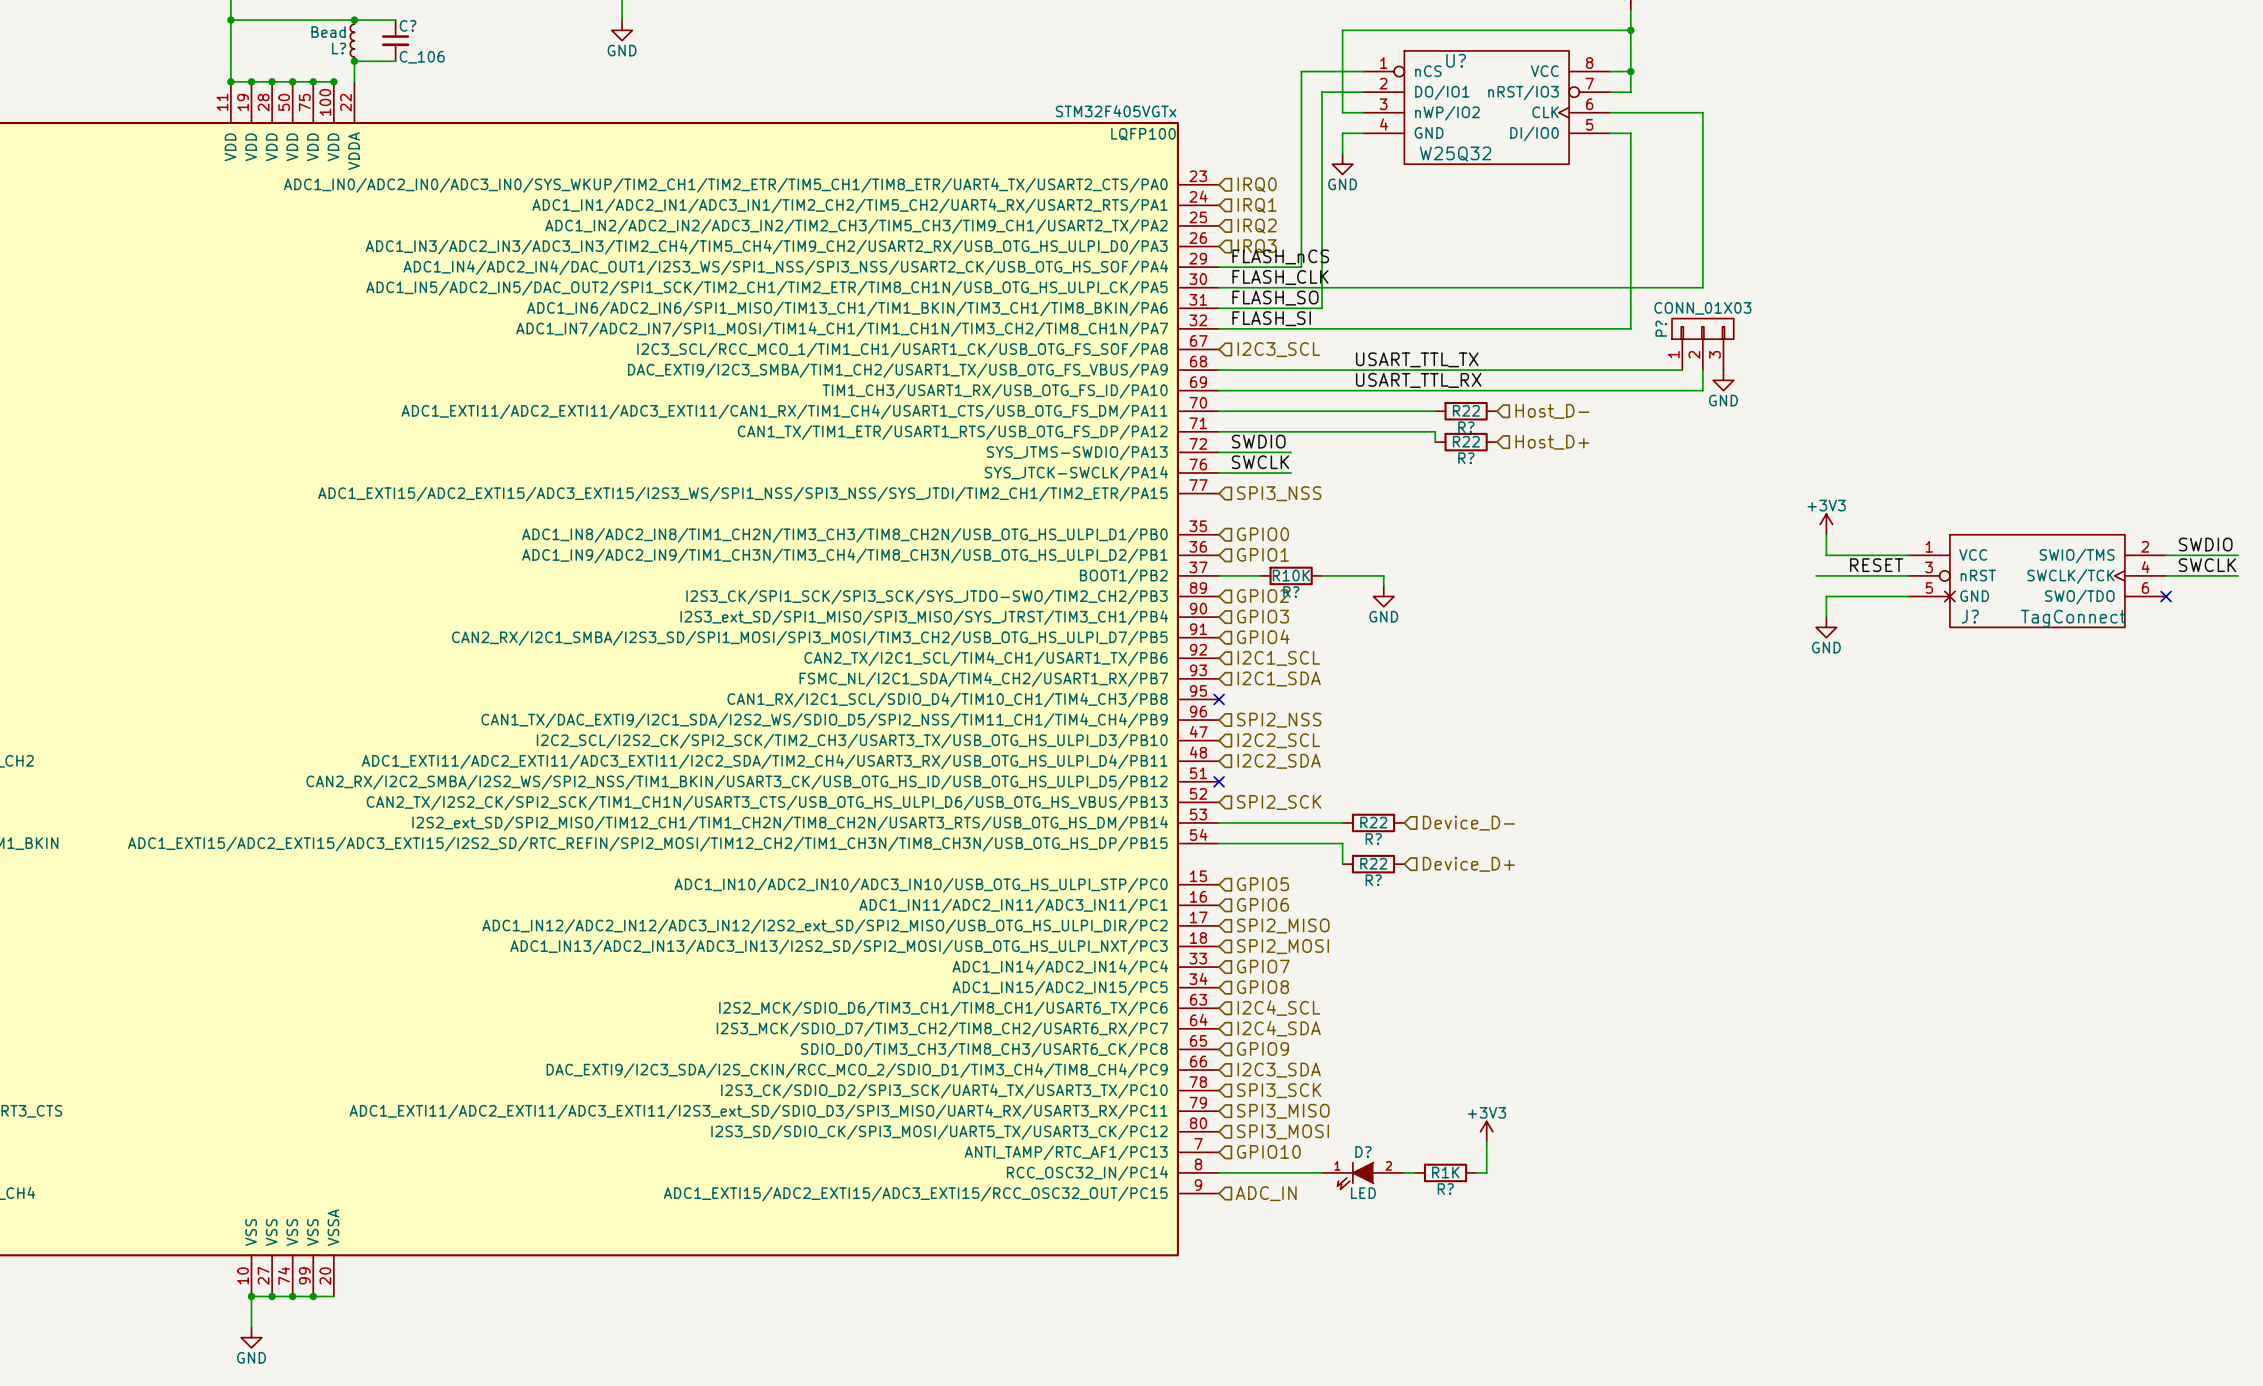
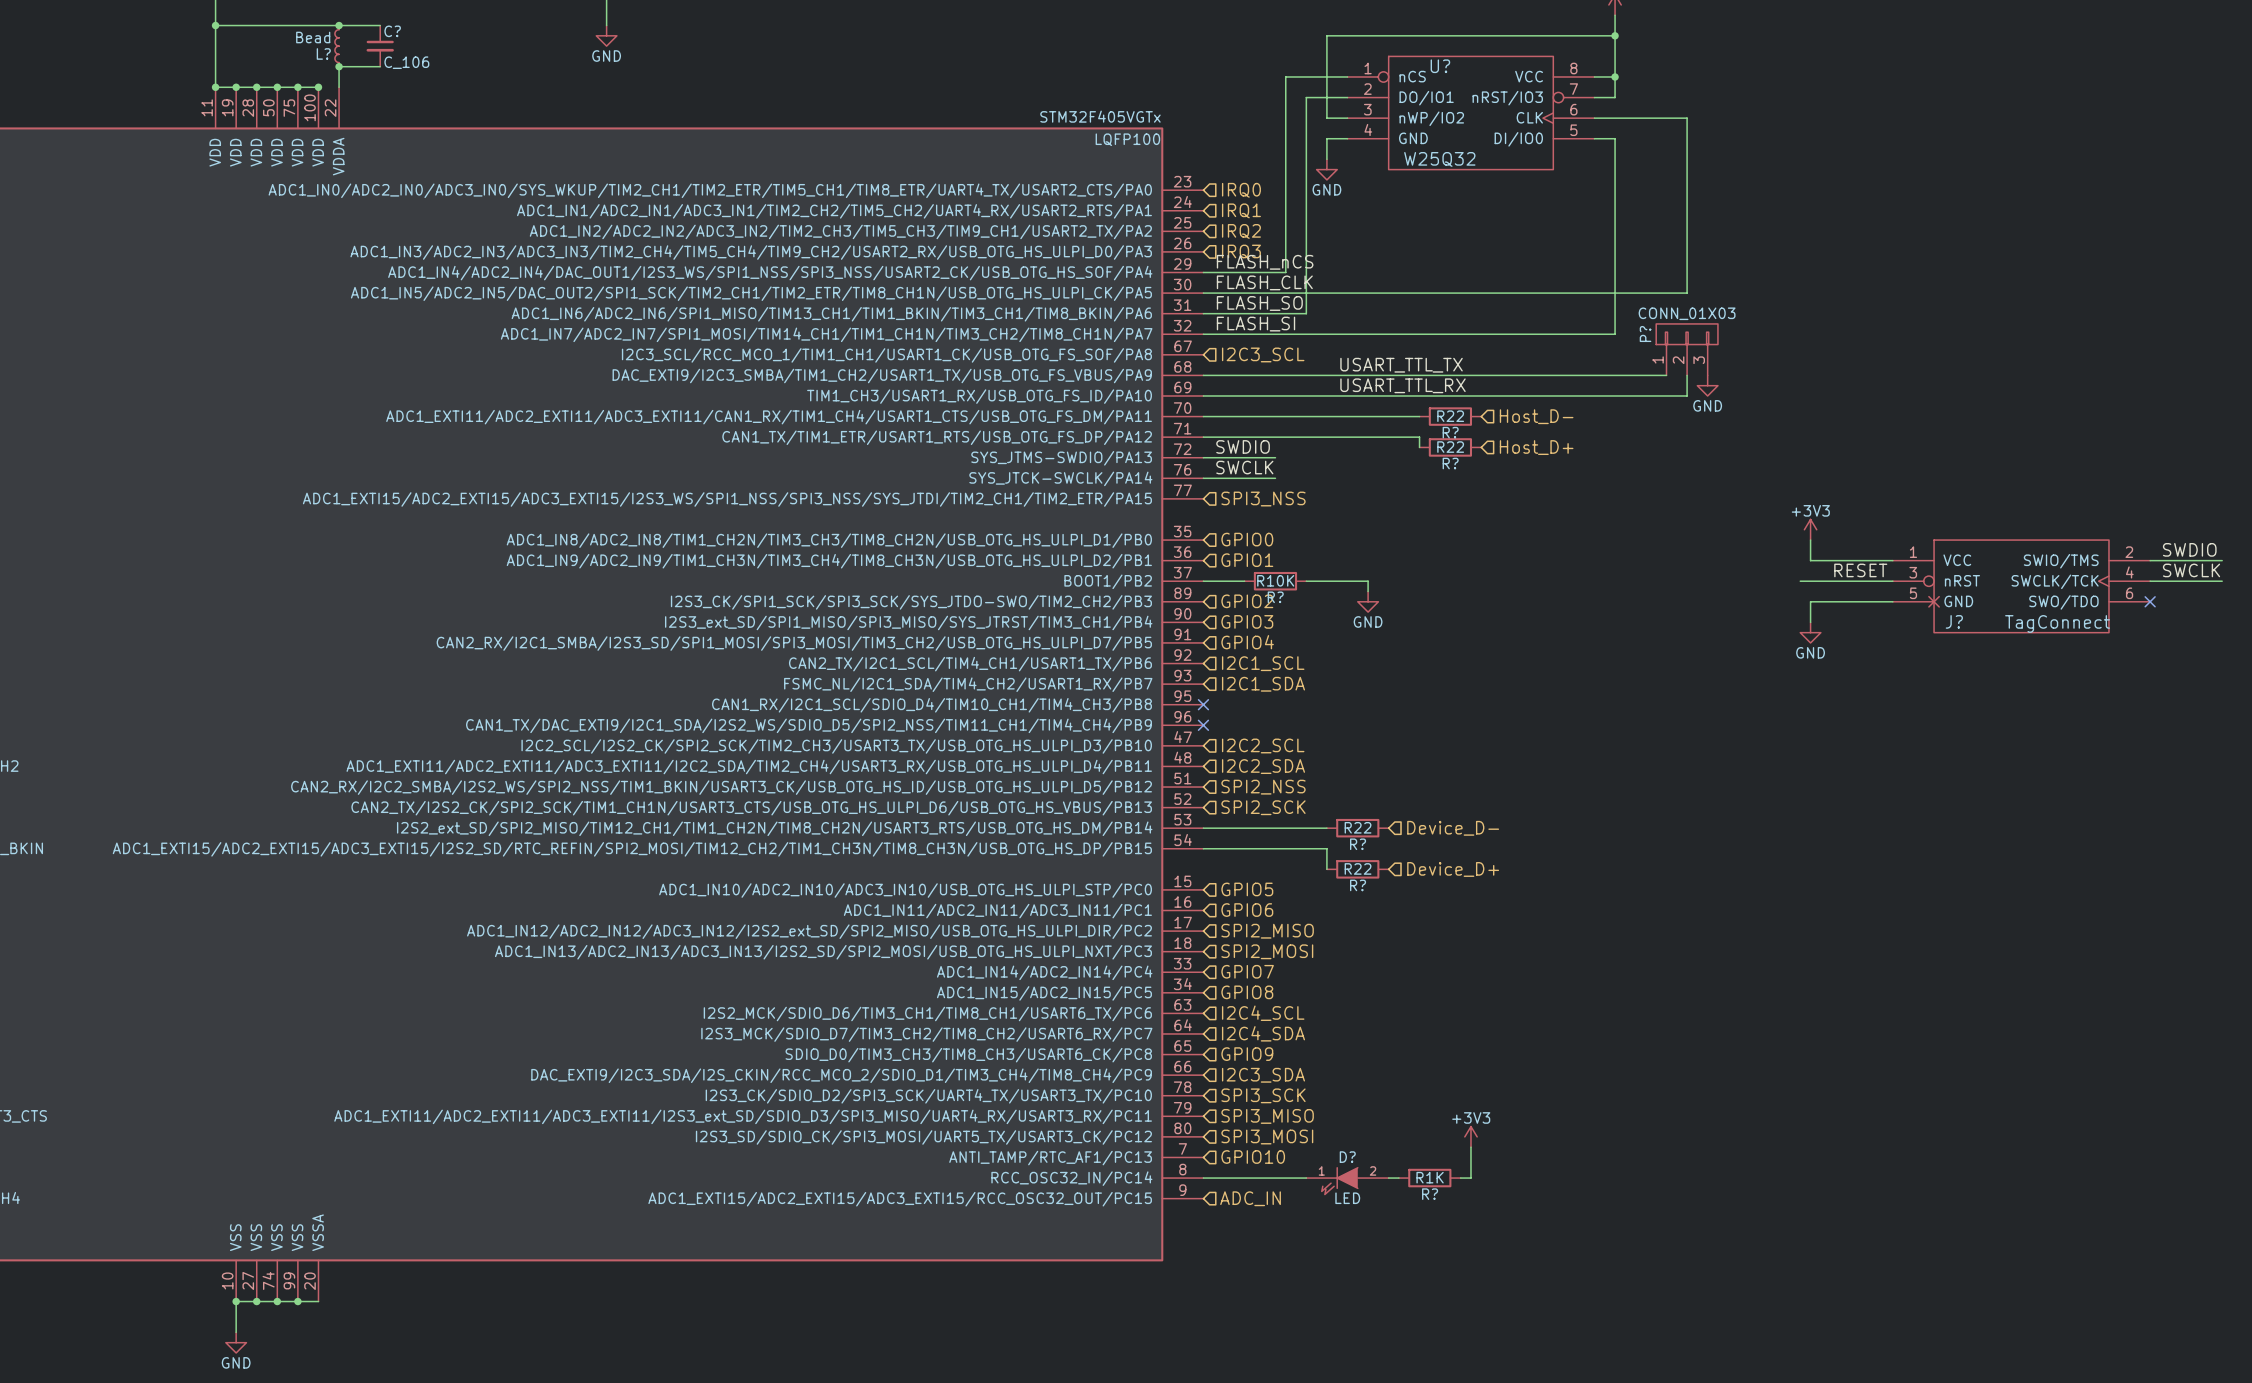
no-connect mark: none -> (1203, 725)
hierarchical label position: SPI2_NSS (1279, 720) -> SPI2_NSS (1263, 787)
no-connect mark: (1219, 781) -> none

